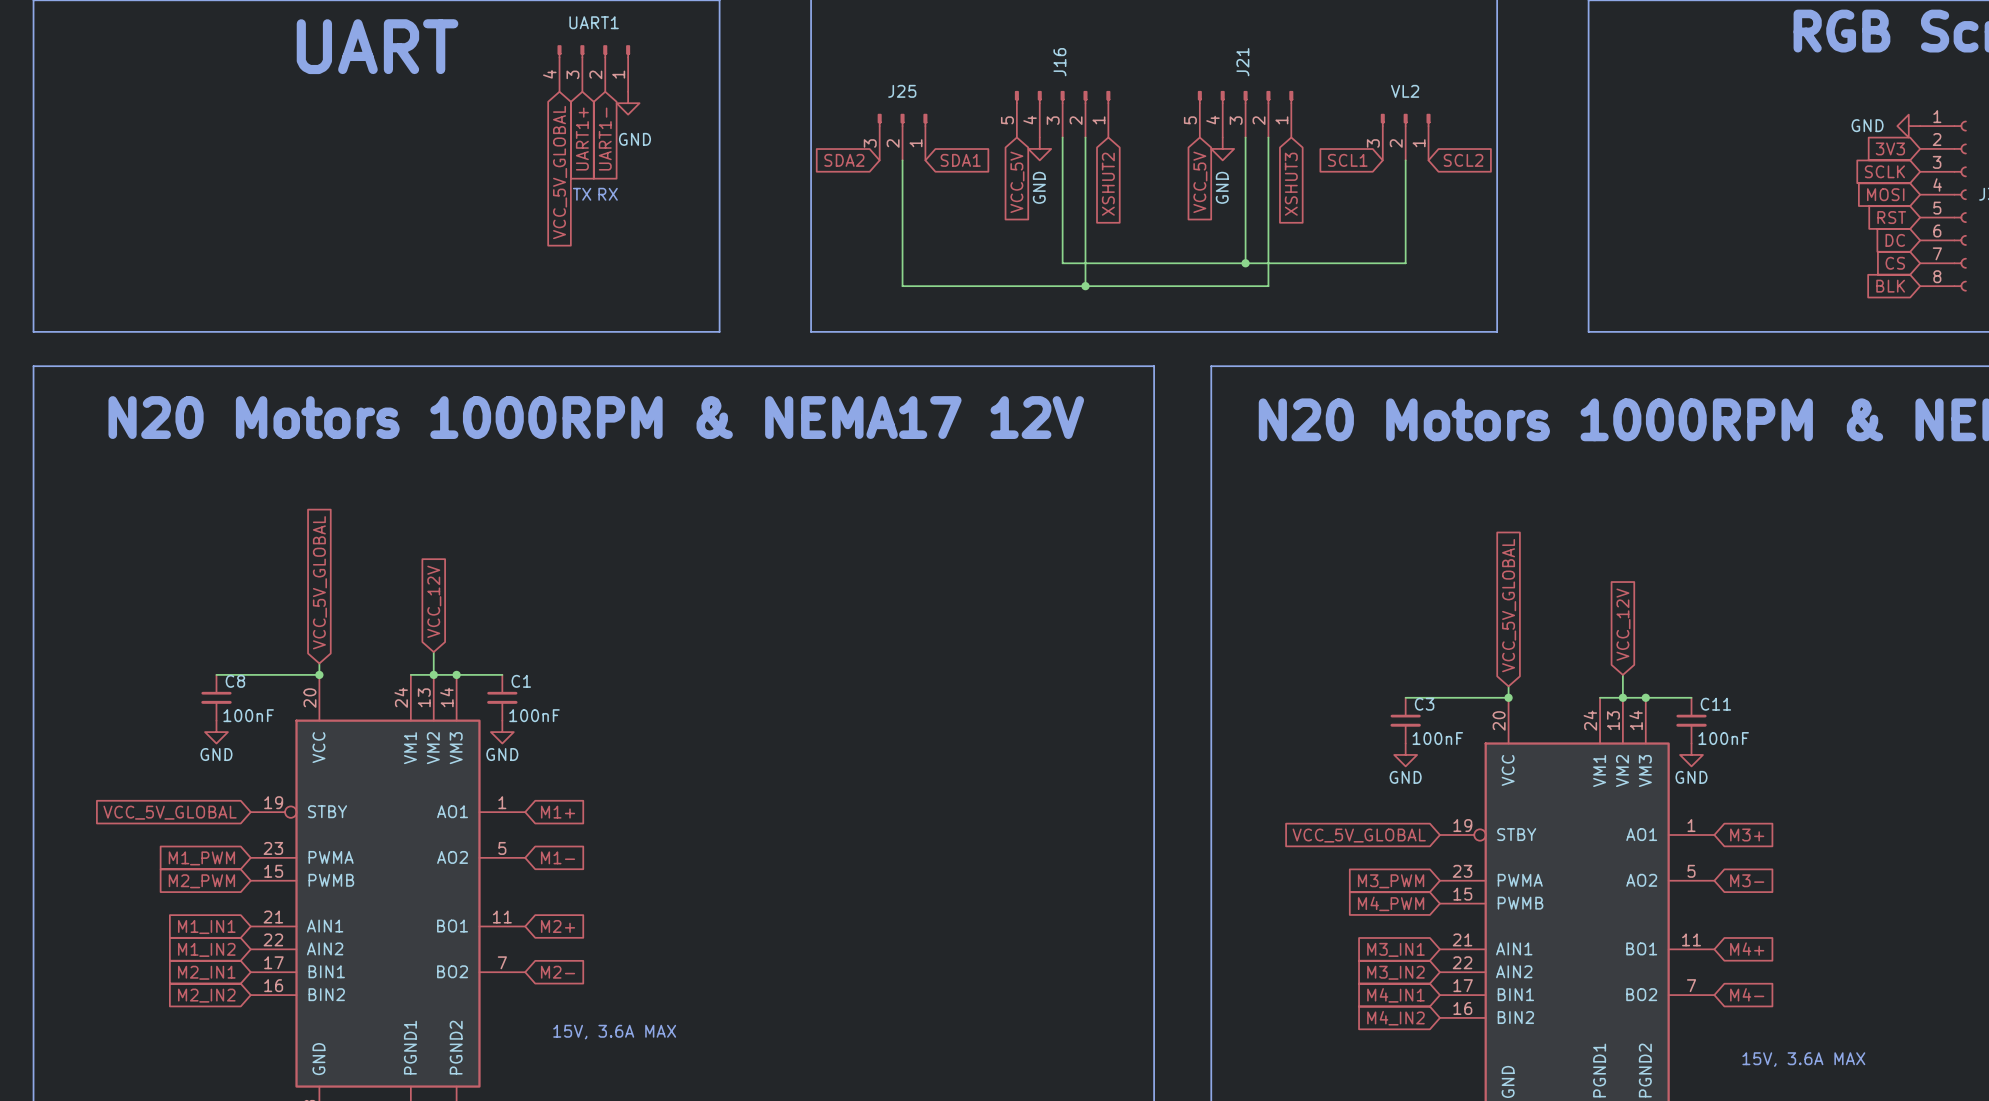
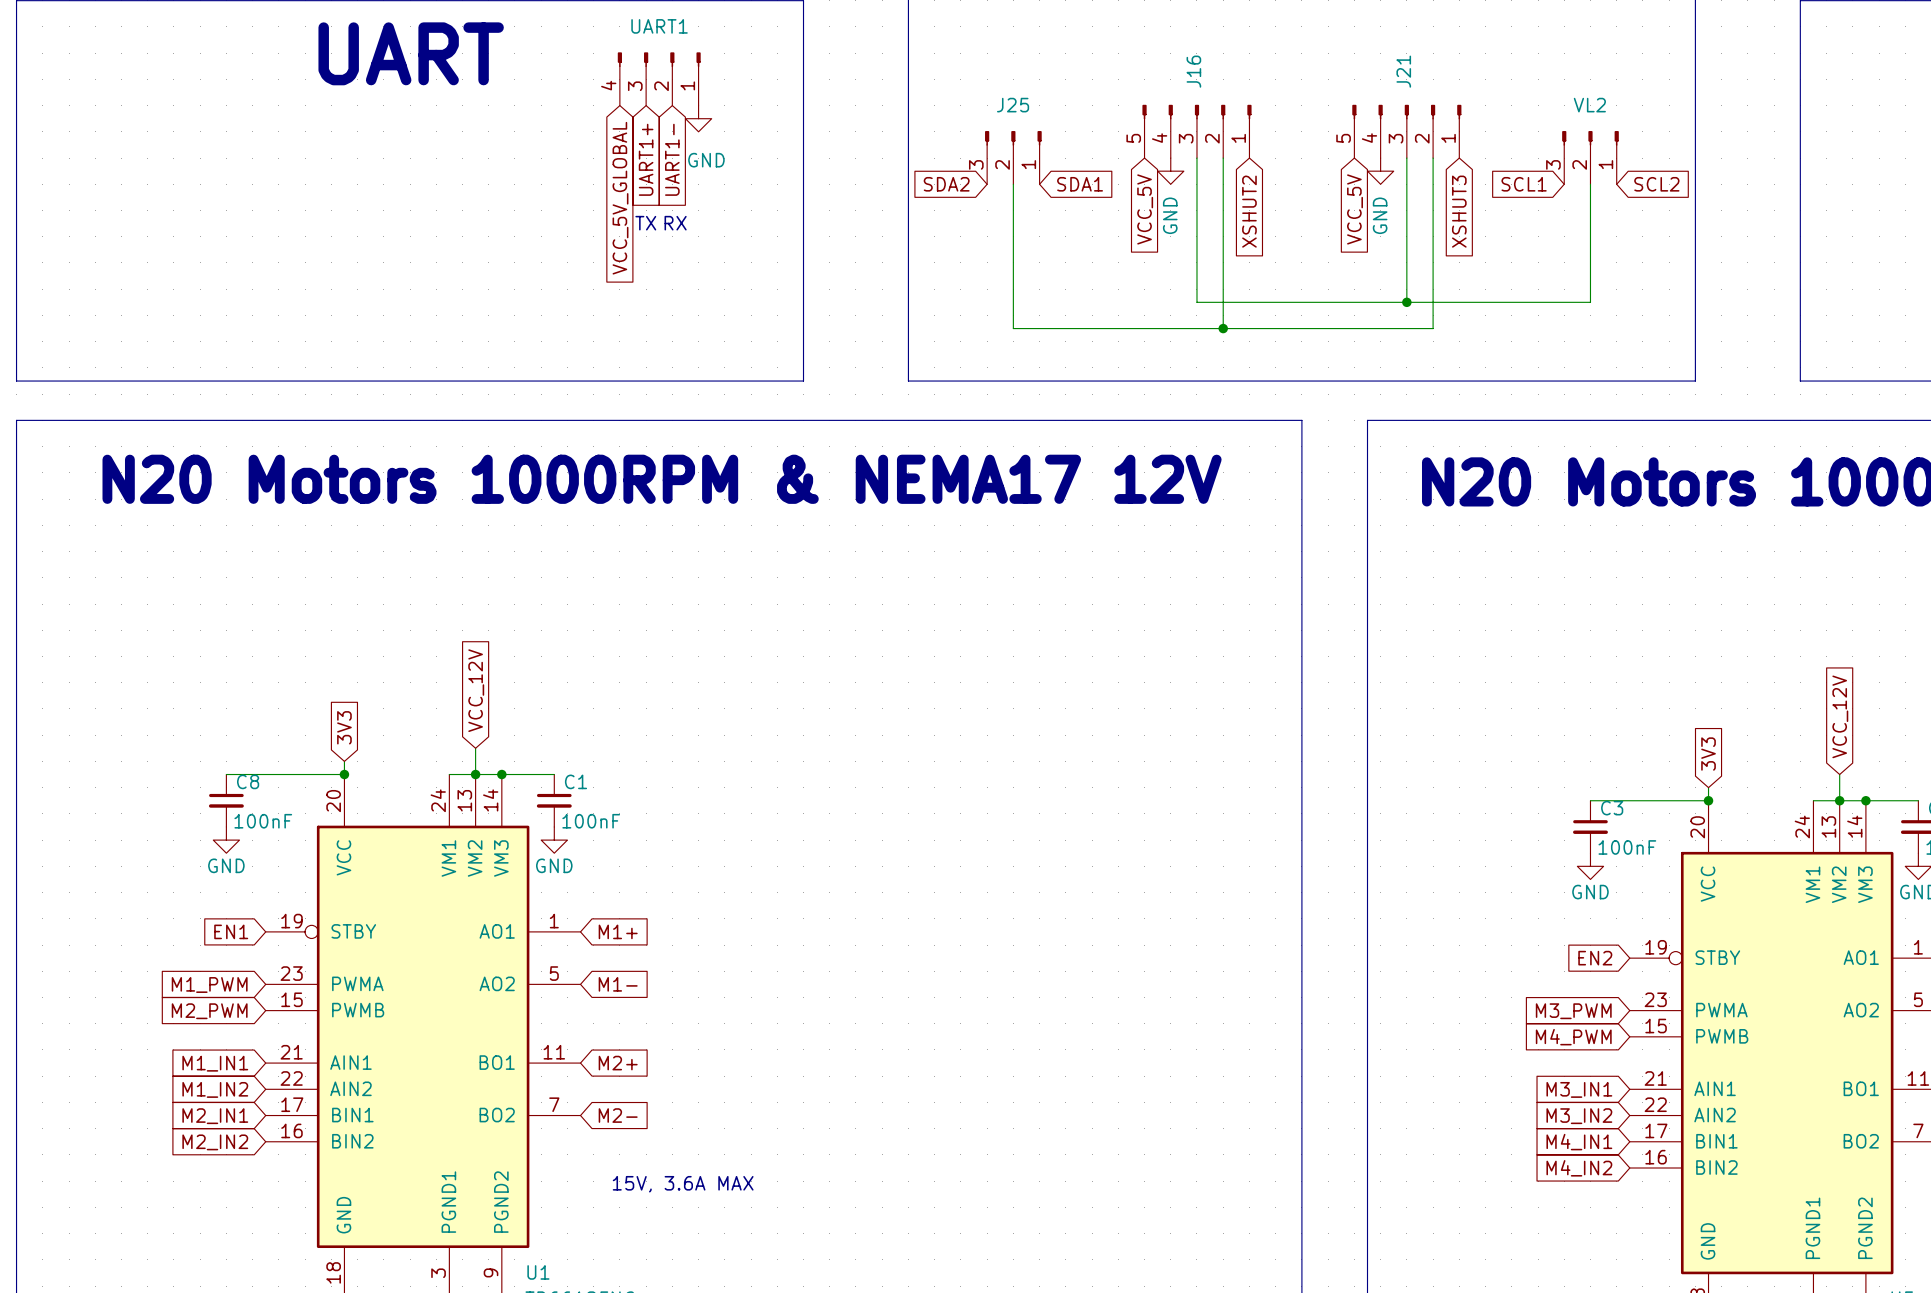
global label: VCC_5V_GLOBAL (319, 582) -> 3V3 (344, 727)
global label: VCC_5V_GLOBAL (1509, 605) -> 3V3 (1708, 754)
global label: VCC_5V_GLOBAL (170, 812) -> EN1 (231, 931)
global label: VCC_5V_GLOBAL (1359, 835) -> EN2 (1595, 958)

